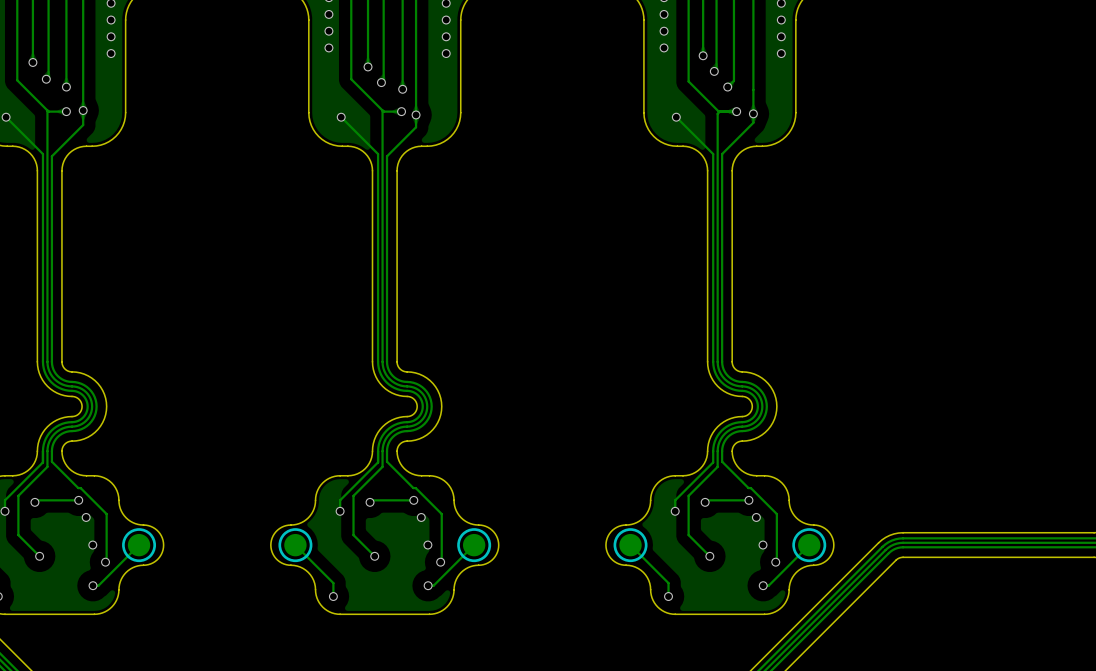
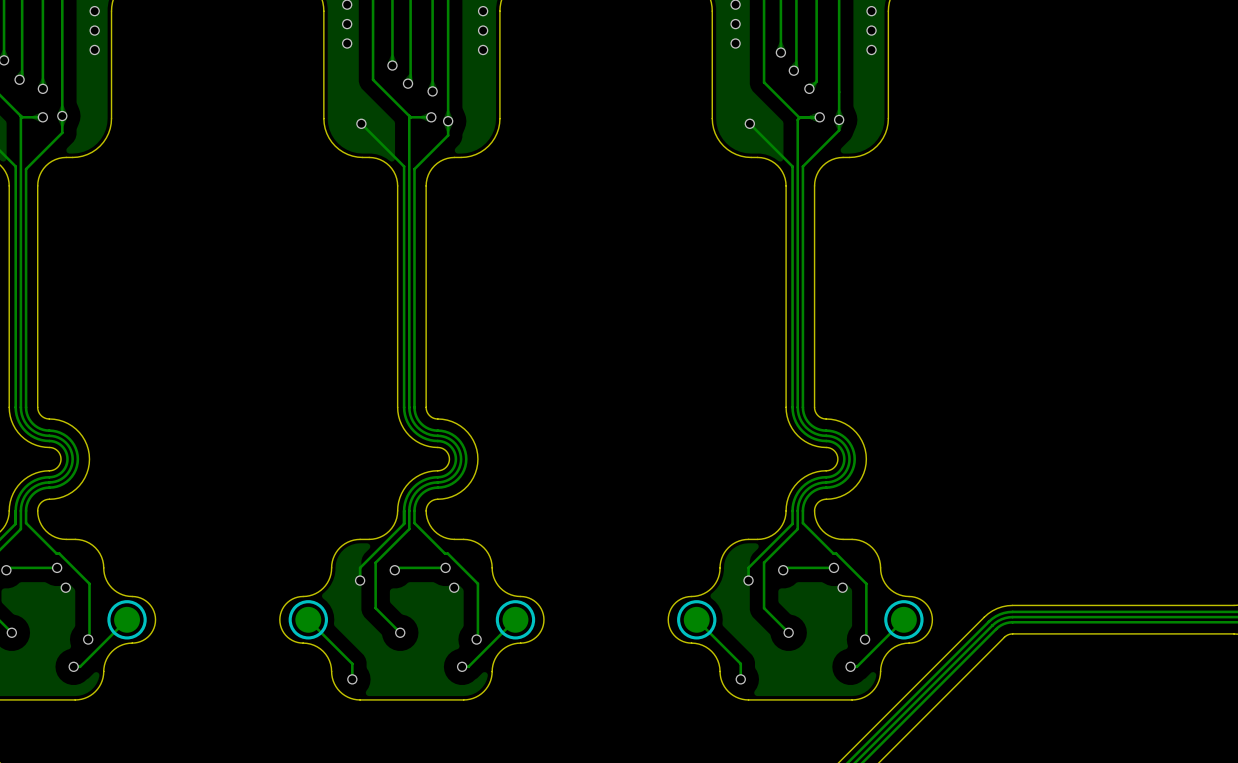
via: (92, 545) -> none
via: (427, 545) -> none
via: (763, 545) -> none

